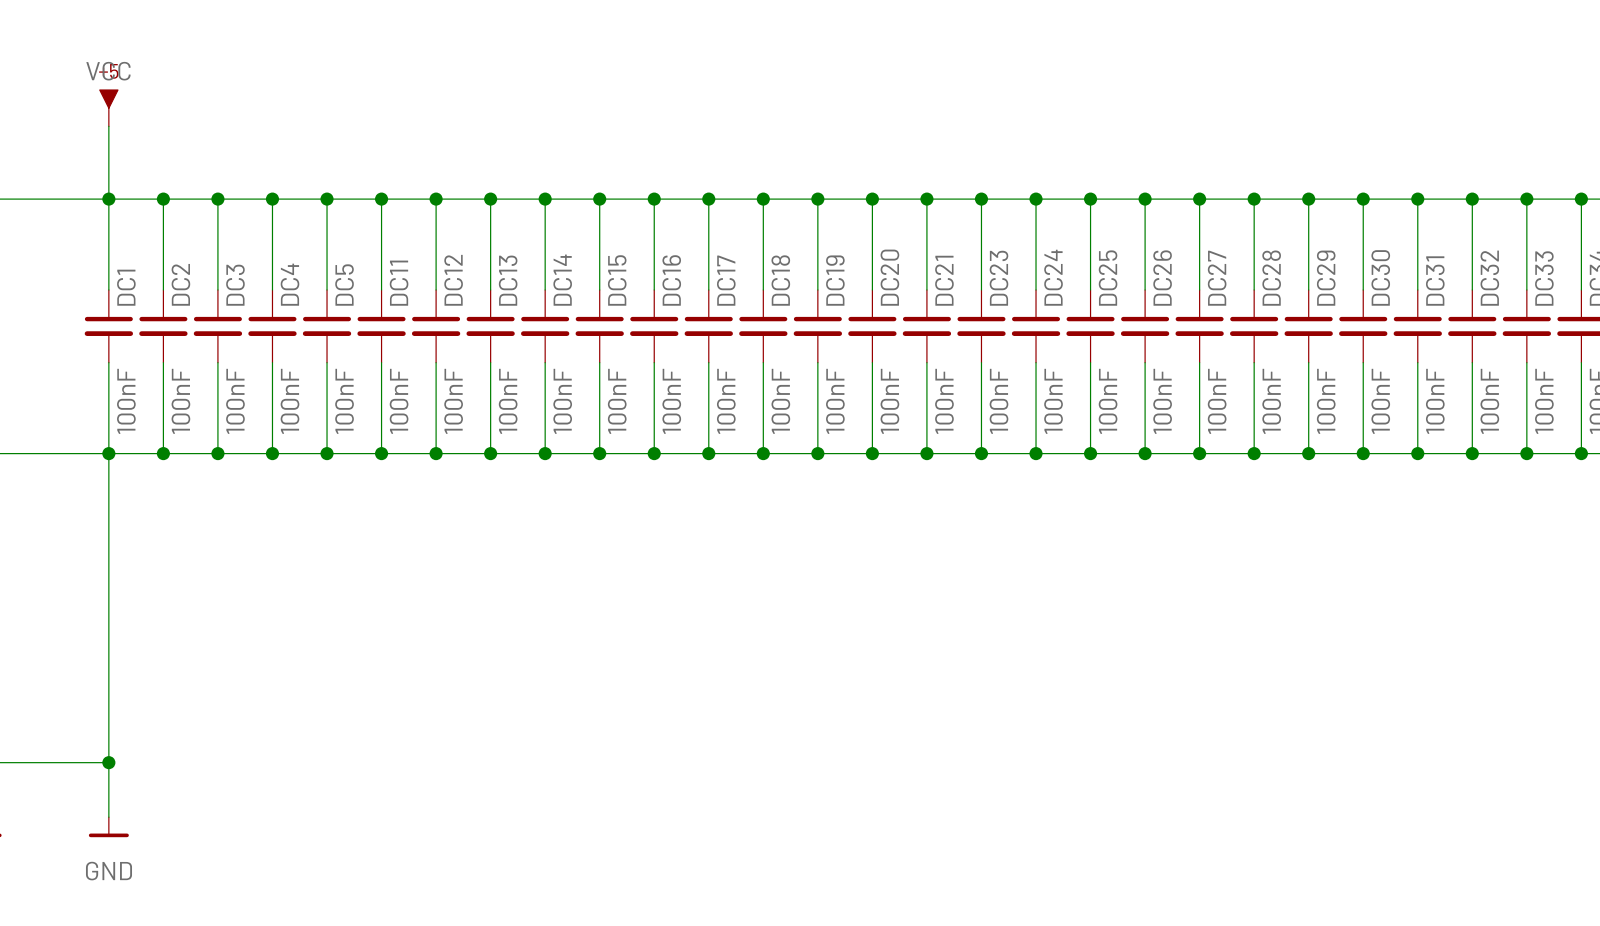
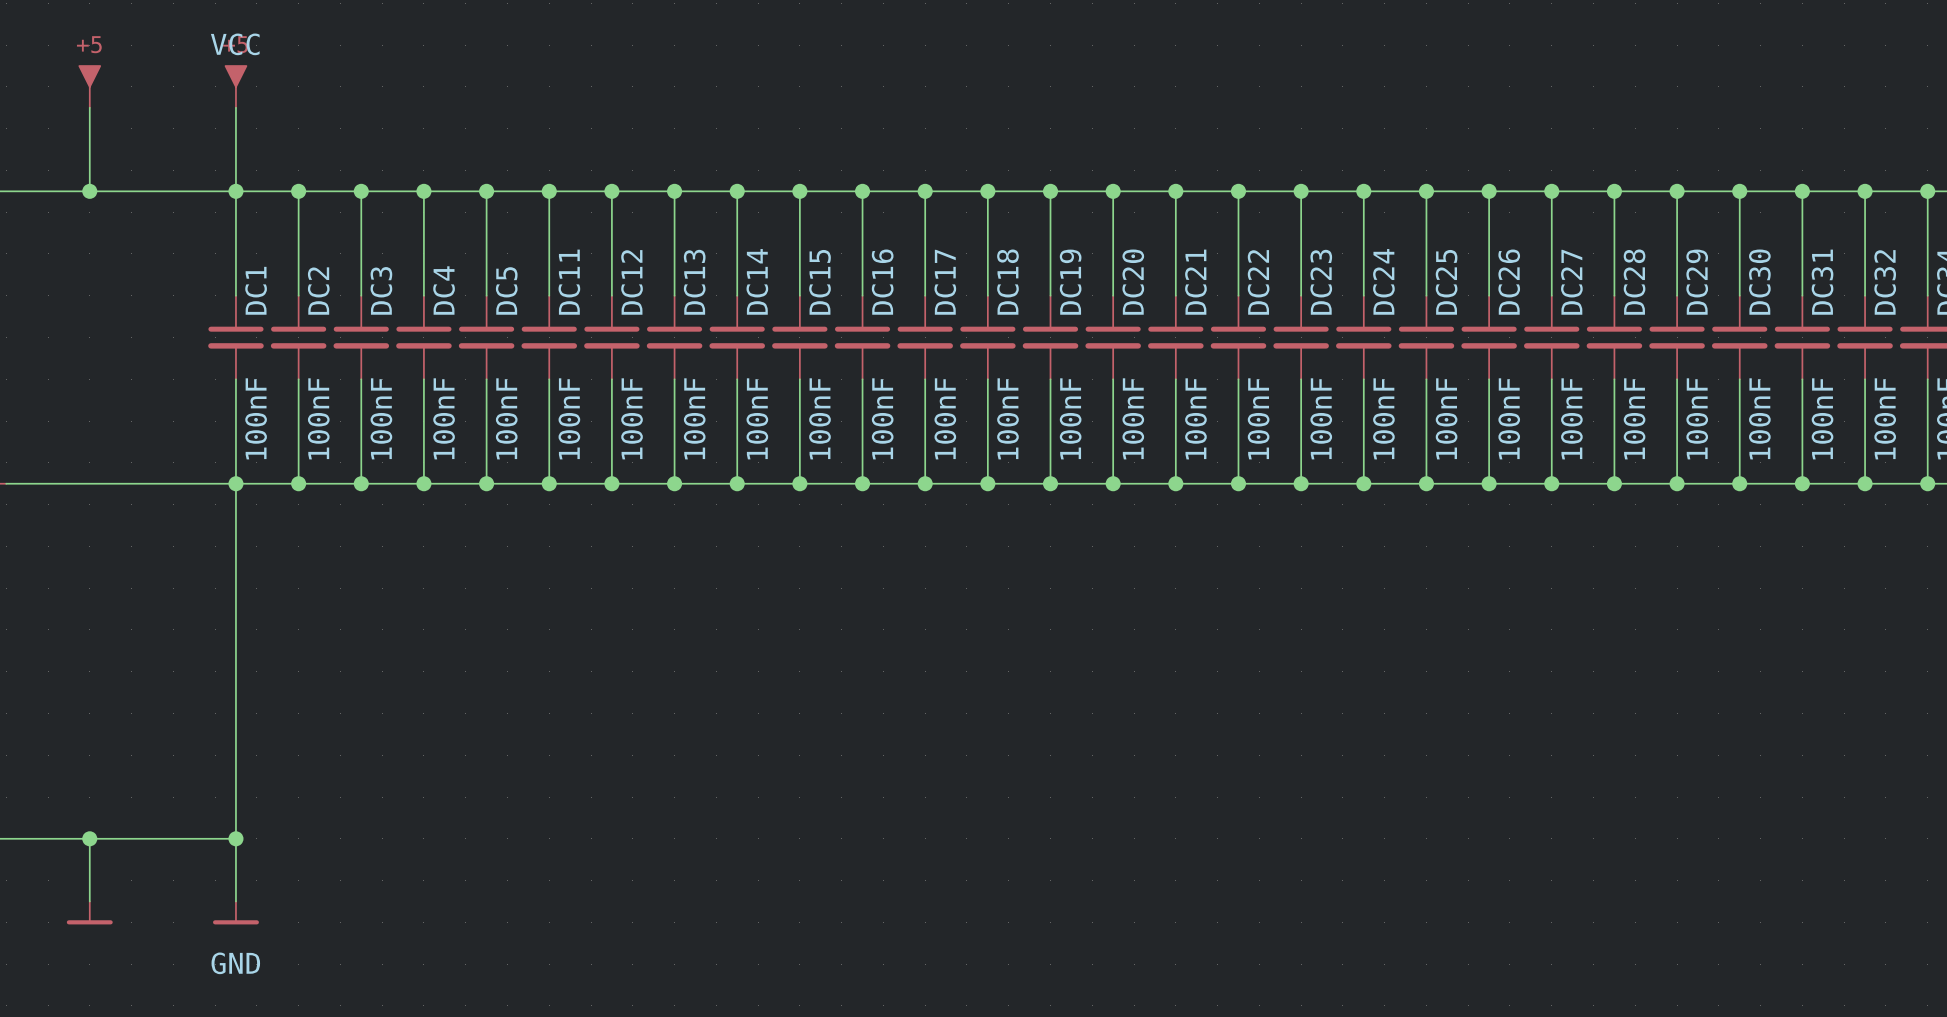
DC24 name: DC24 (1053, 277) -> DC23 (1321, 282)
DC30 name: DC30 (1380, 277) -> DC29 (1697, 282)
DC23 name: DC23 (998, 278) -> DC22 (1258, 282)
DC25 name: DC25 (1108, 278) -> DC24 (1383, 281)
DC26 name: DC26 (1162, 278) -> DC25 (1446, 282)
DC27 name: DC27 (1217, 278) -> DC26 (1509, 282)
DC28 name: DC28 (1271, 278) -> DC27 (1571, 282)
DC29 name: DC29 (1326, 278) -> DC28 (1634, 282)
DC32 name: DC32 (1489, 278) -> DC31 (1822, 282)
DC33 name: DC33 (1544, 278) -> DC32 (1885, 282)
DC31 name: DC31 (1435, 281) -> DC30 (1759, 282)

